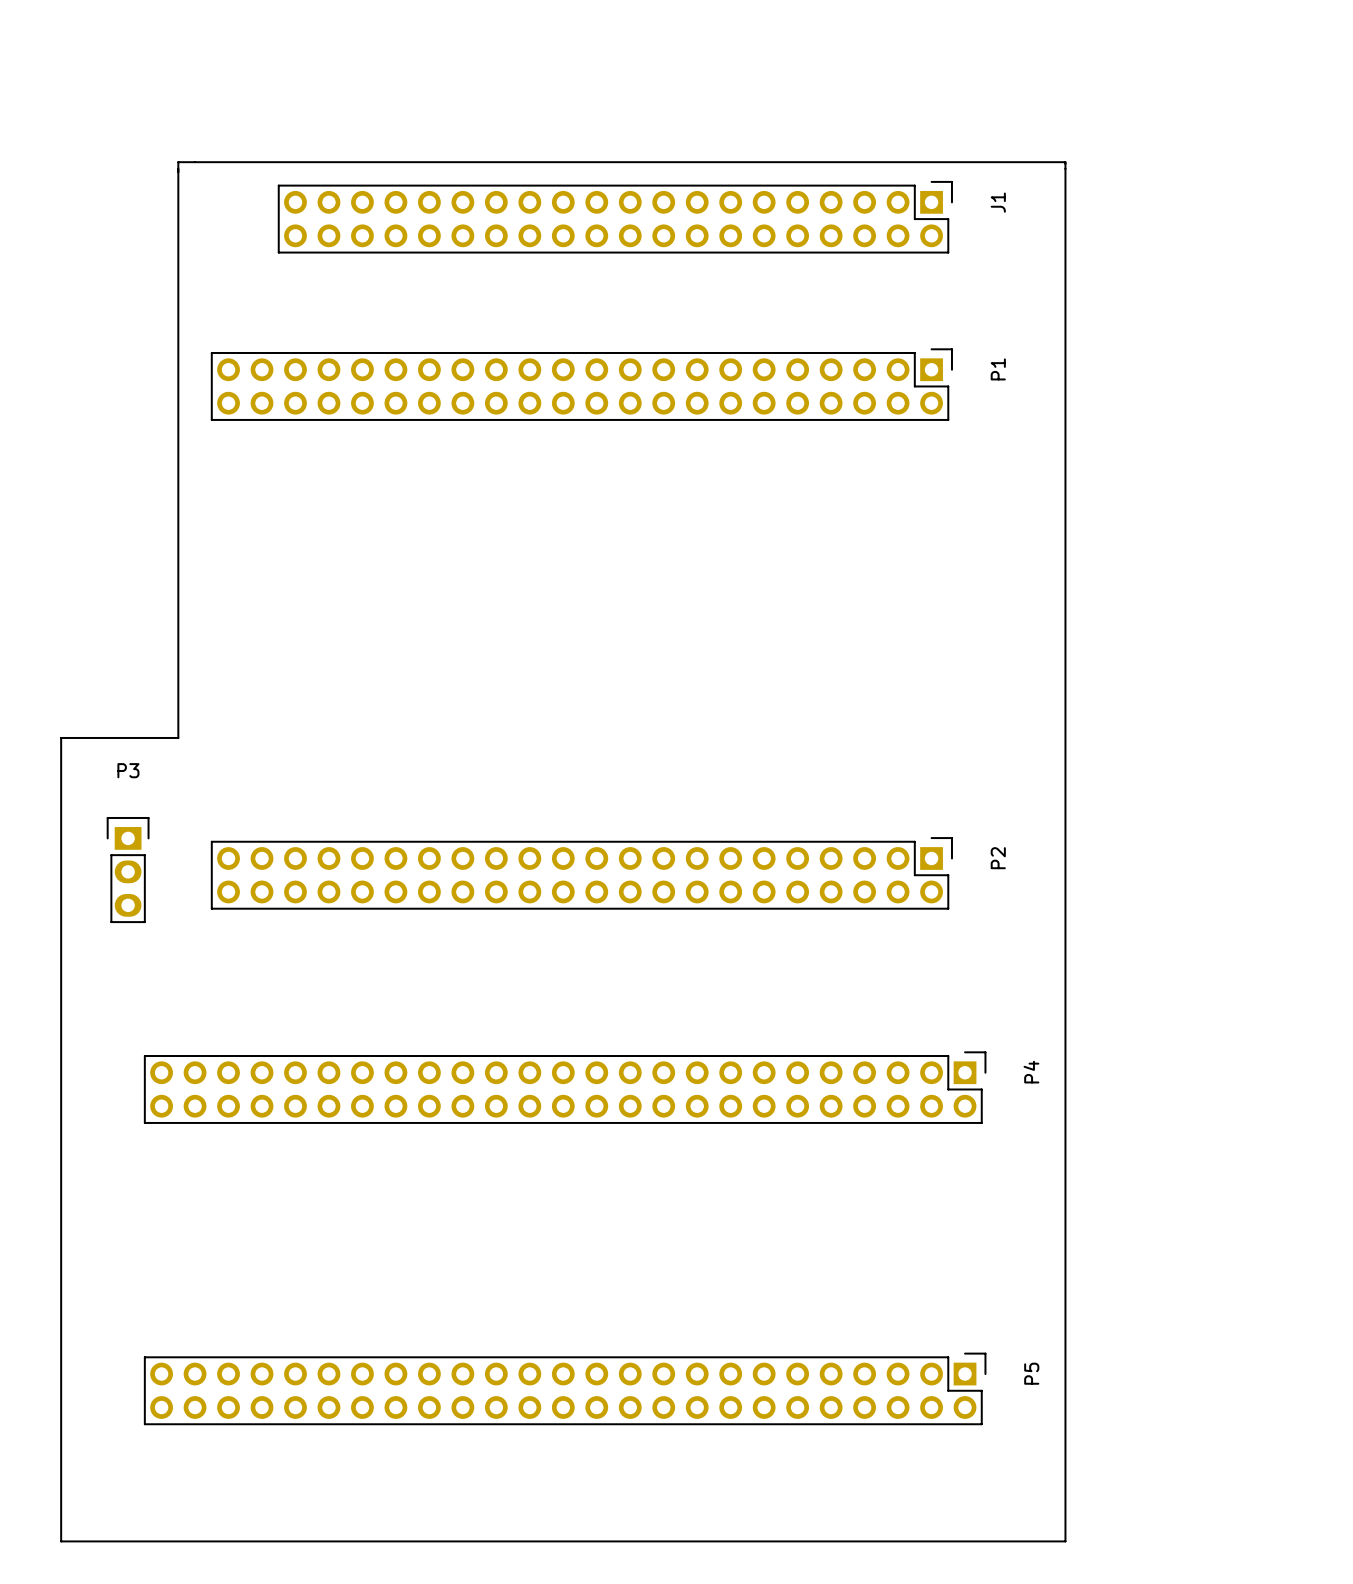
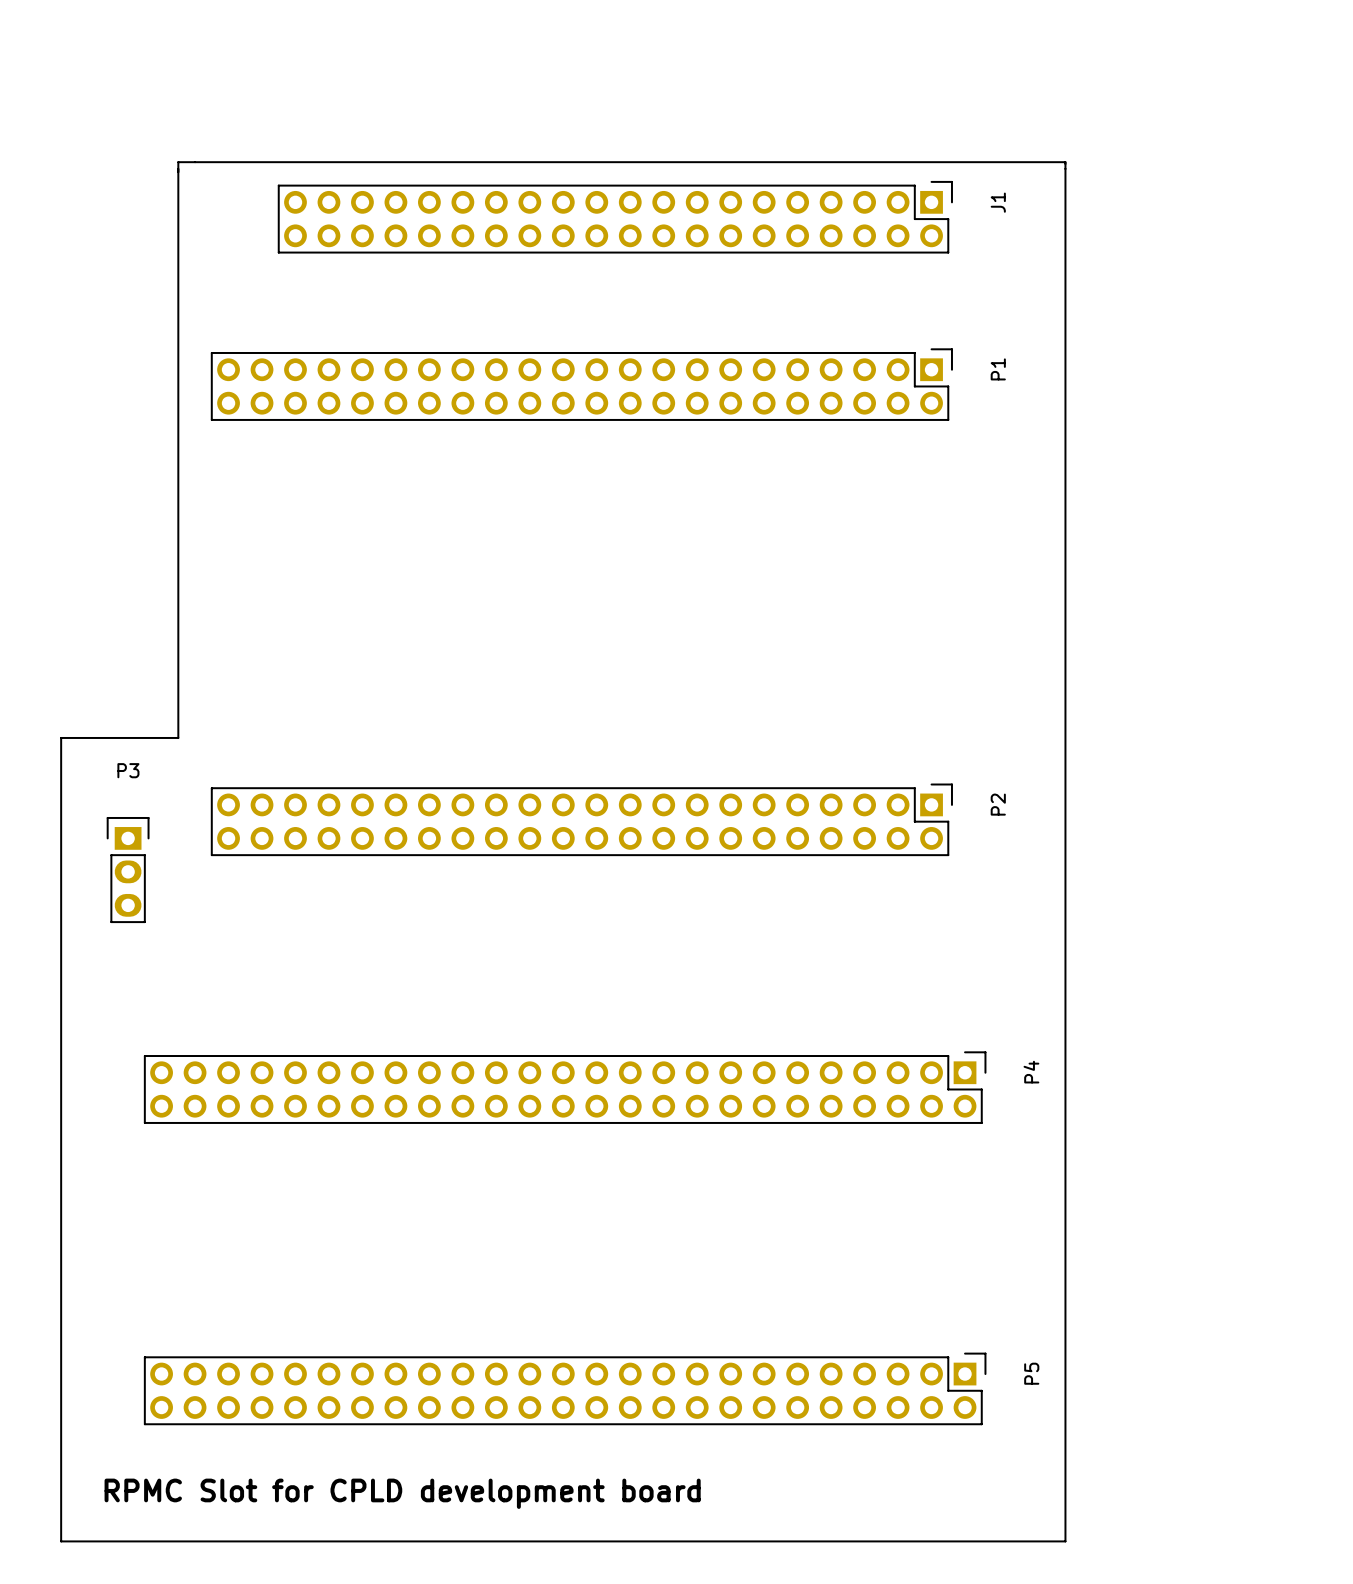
P2 position: (581, 873) -> (581, 819)
text: none -> RPMC Slot for CPLD development board (402, 1493)

